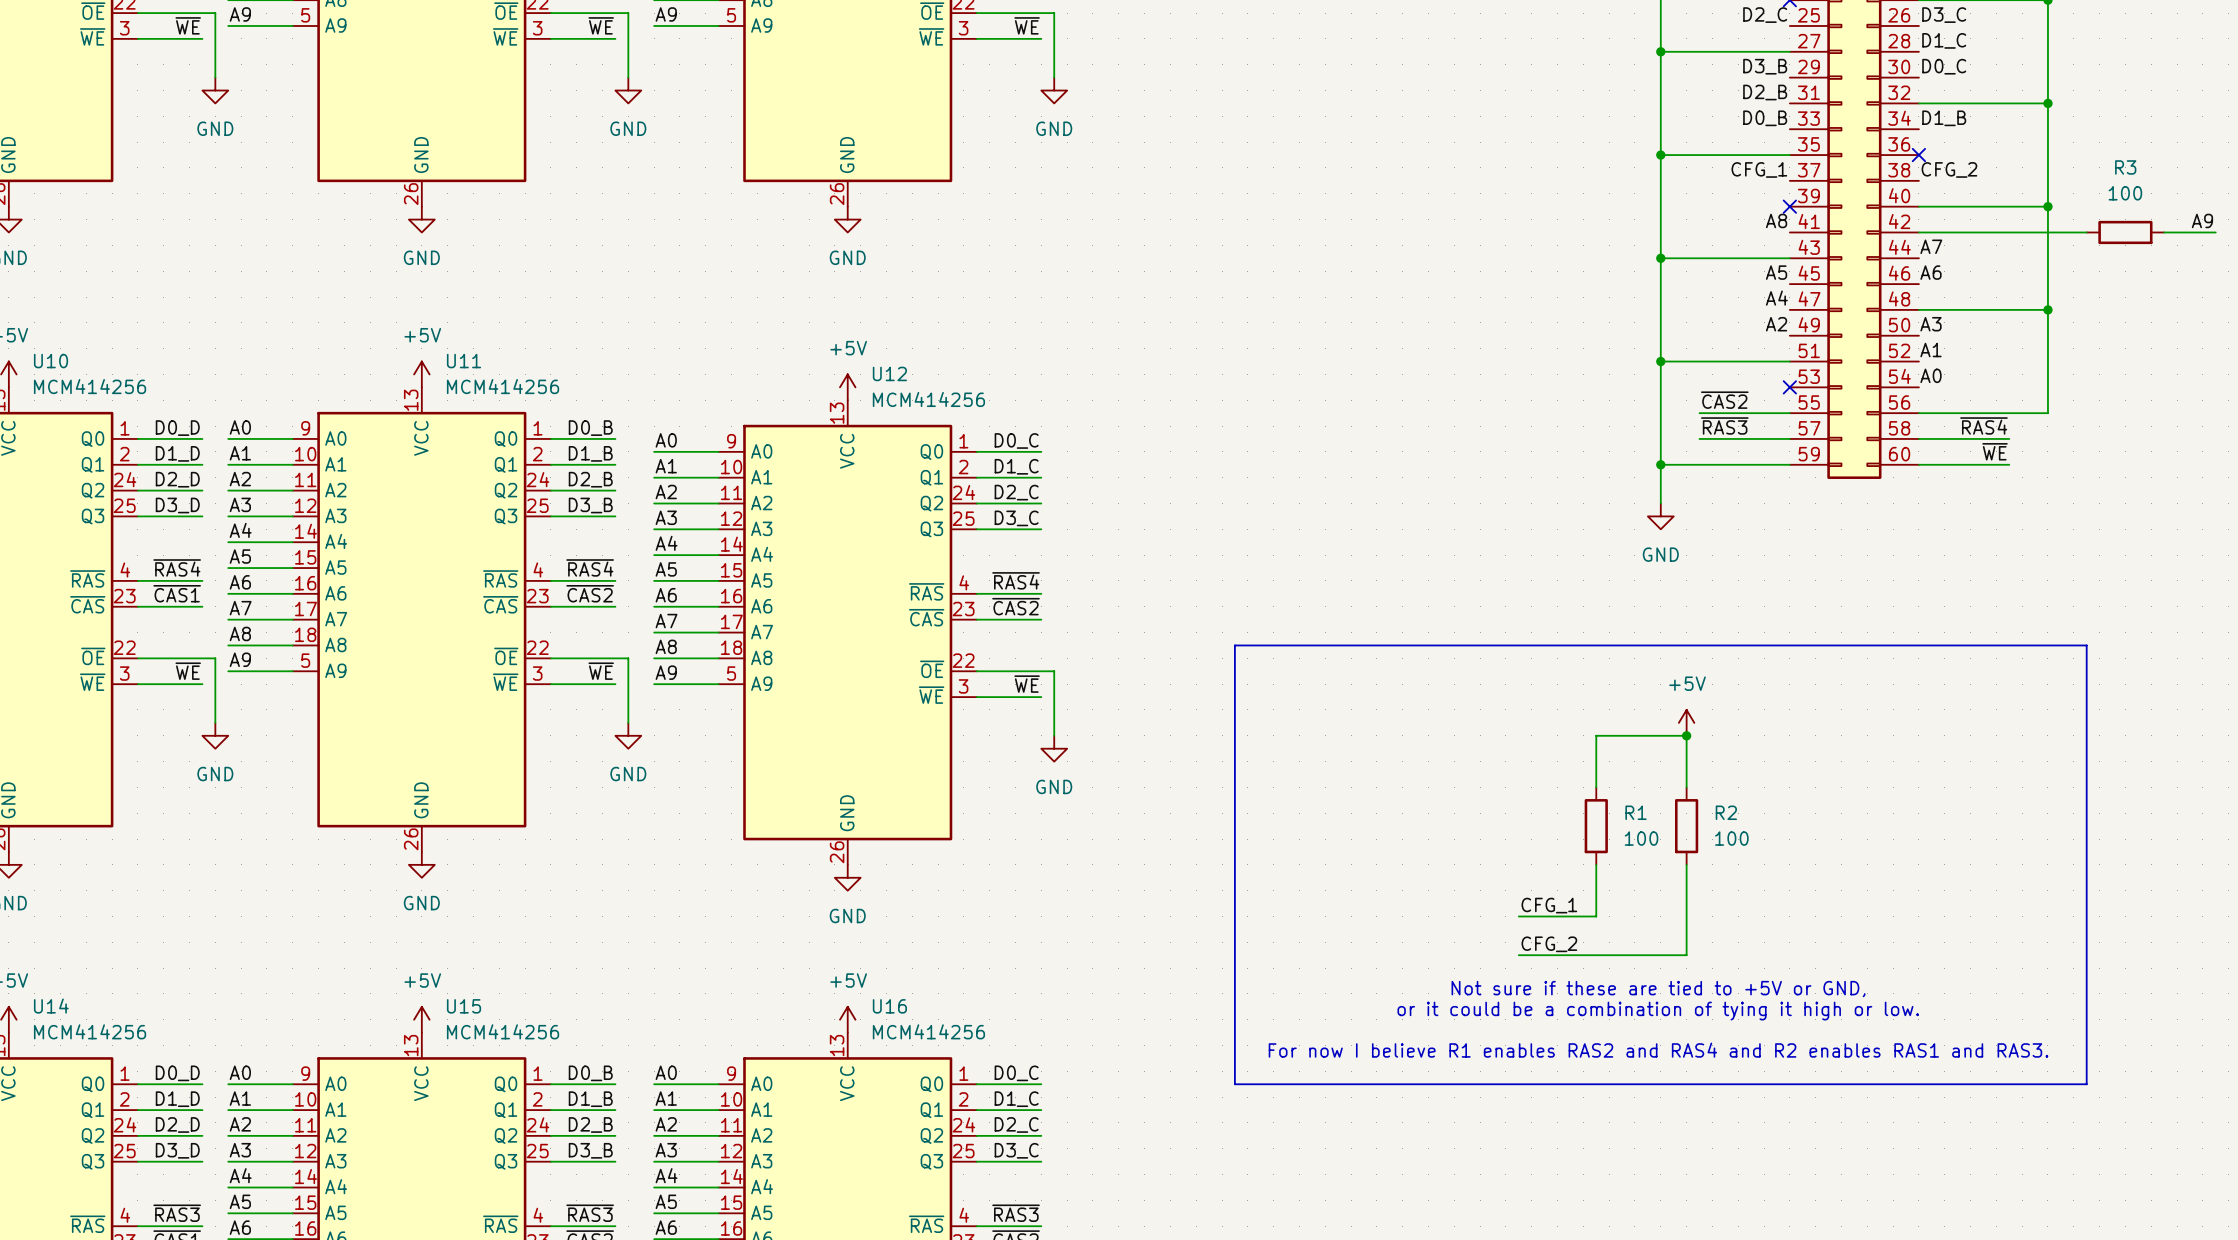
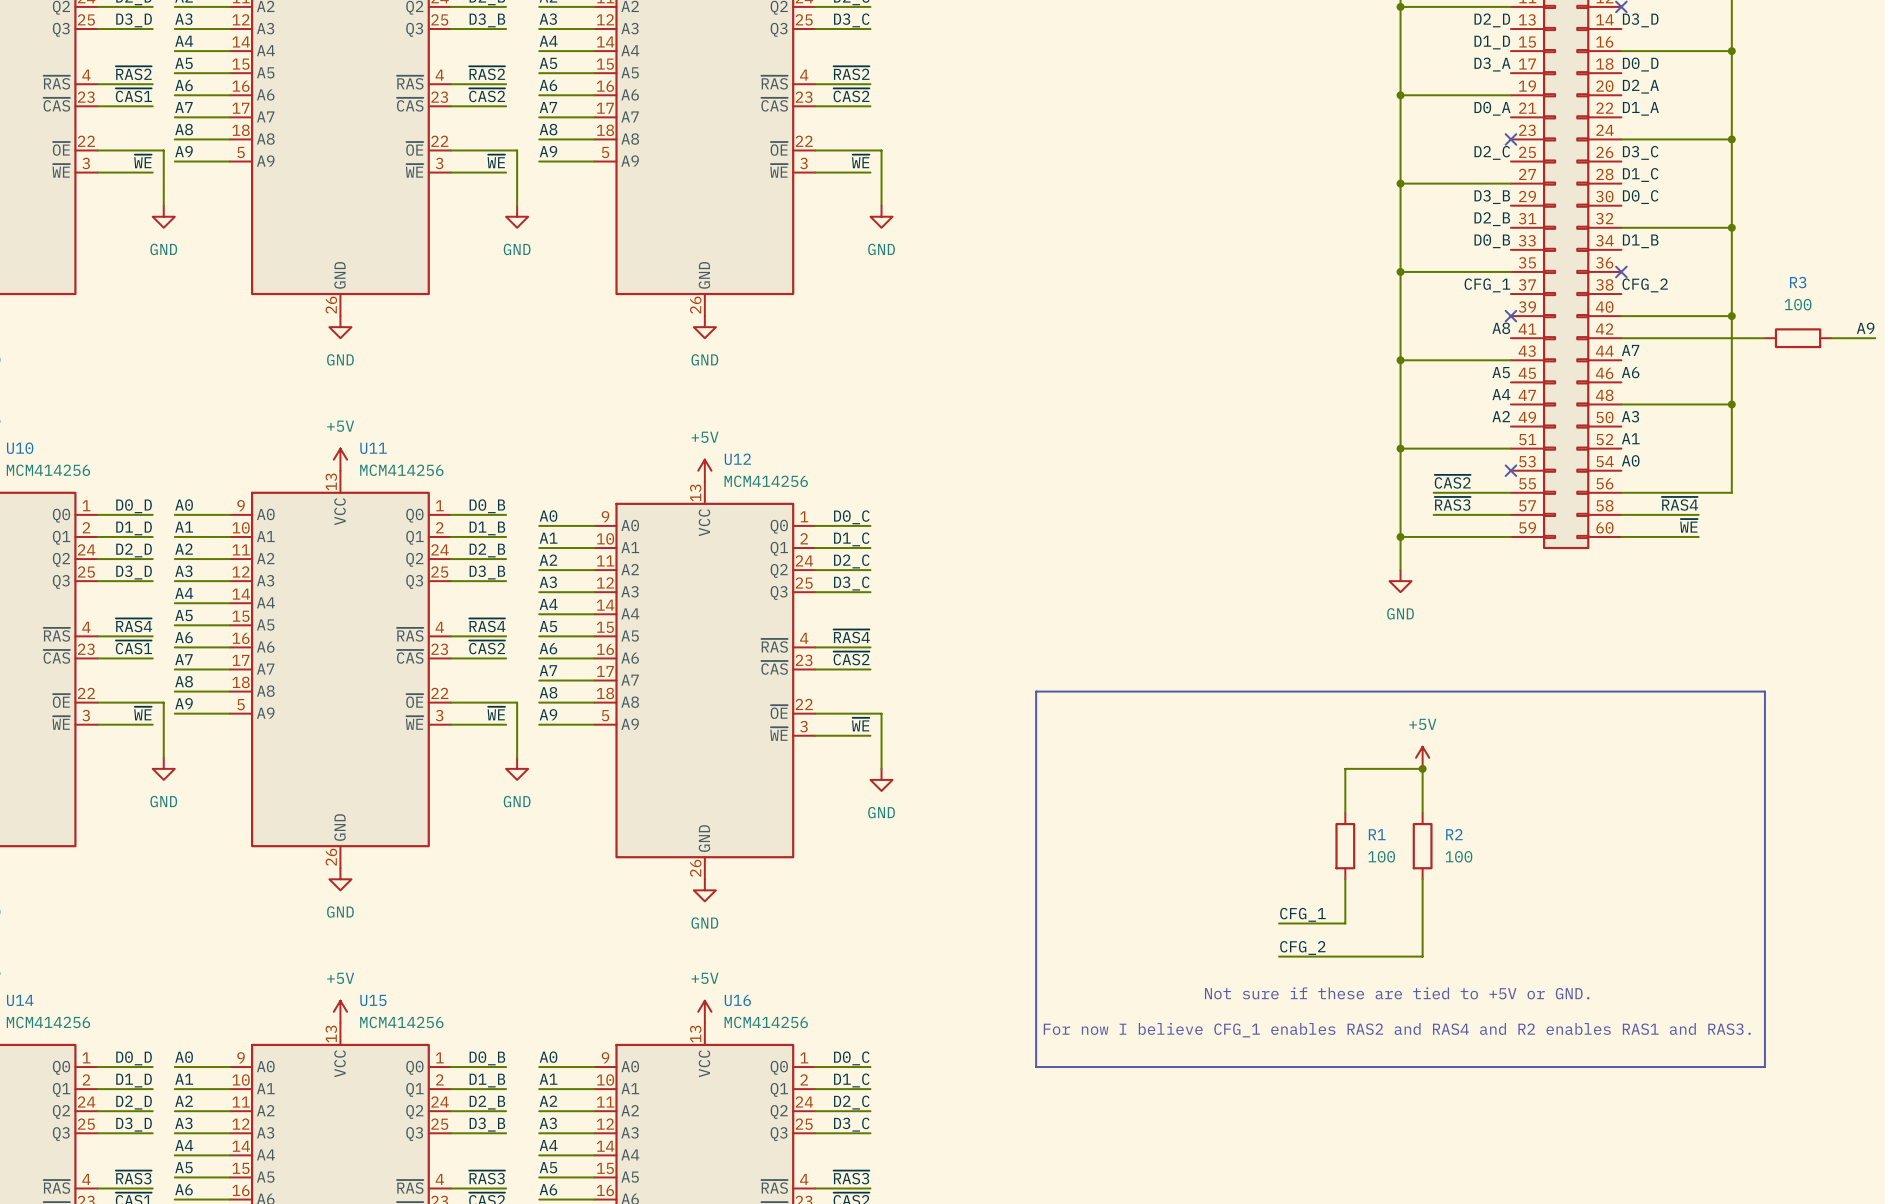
text: Not sure if these are tied to +5V or GND, (1658, 989) -> Not sure if these are tied to +5V or GND. (1397, 993)
text: or it could be a combination of tying it high or low. (1658, 1011) -> none
text: For now I believe R1 enables RAS2 and RAS4 and R2 enables RAS1 and RAS3. (1658, 1050) -> For now I believe CFG_1 enables RAS2 and RAS4 and R2 enables RAS1 and RAS3. (1397, 1030)

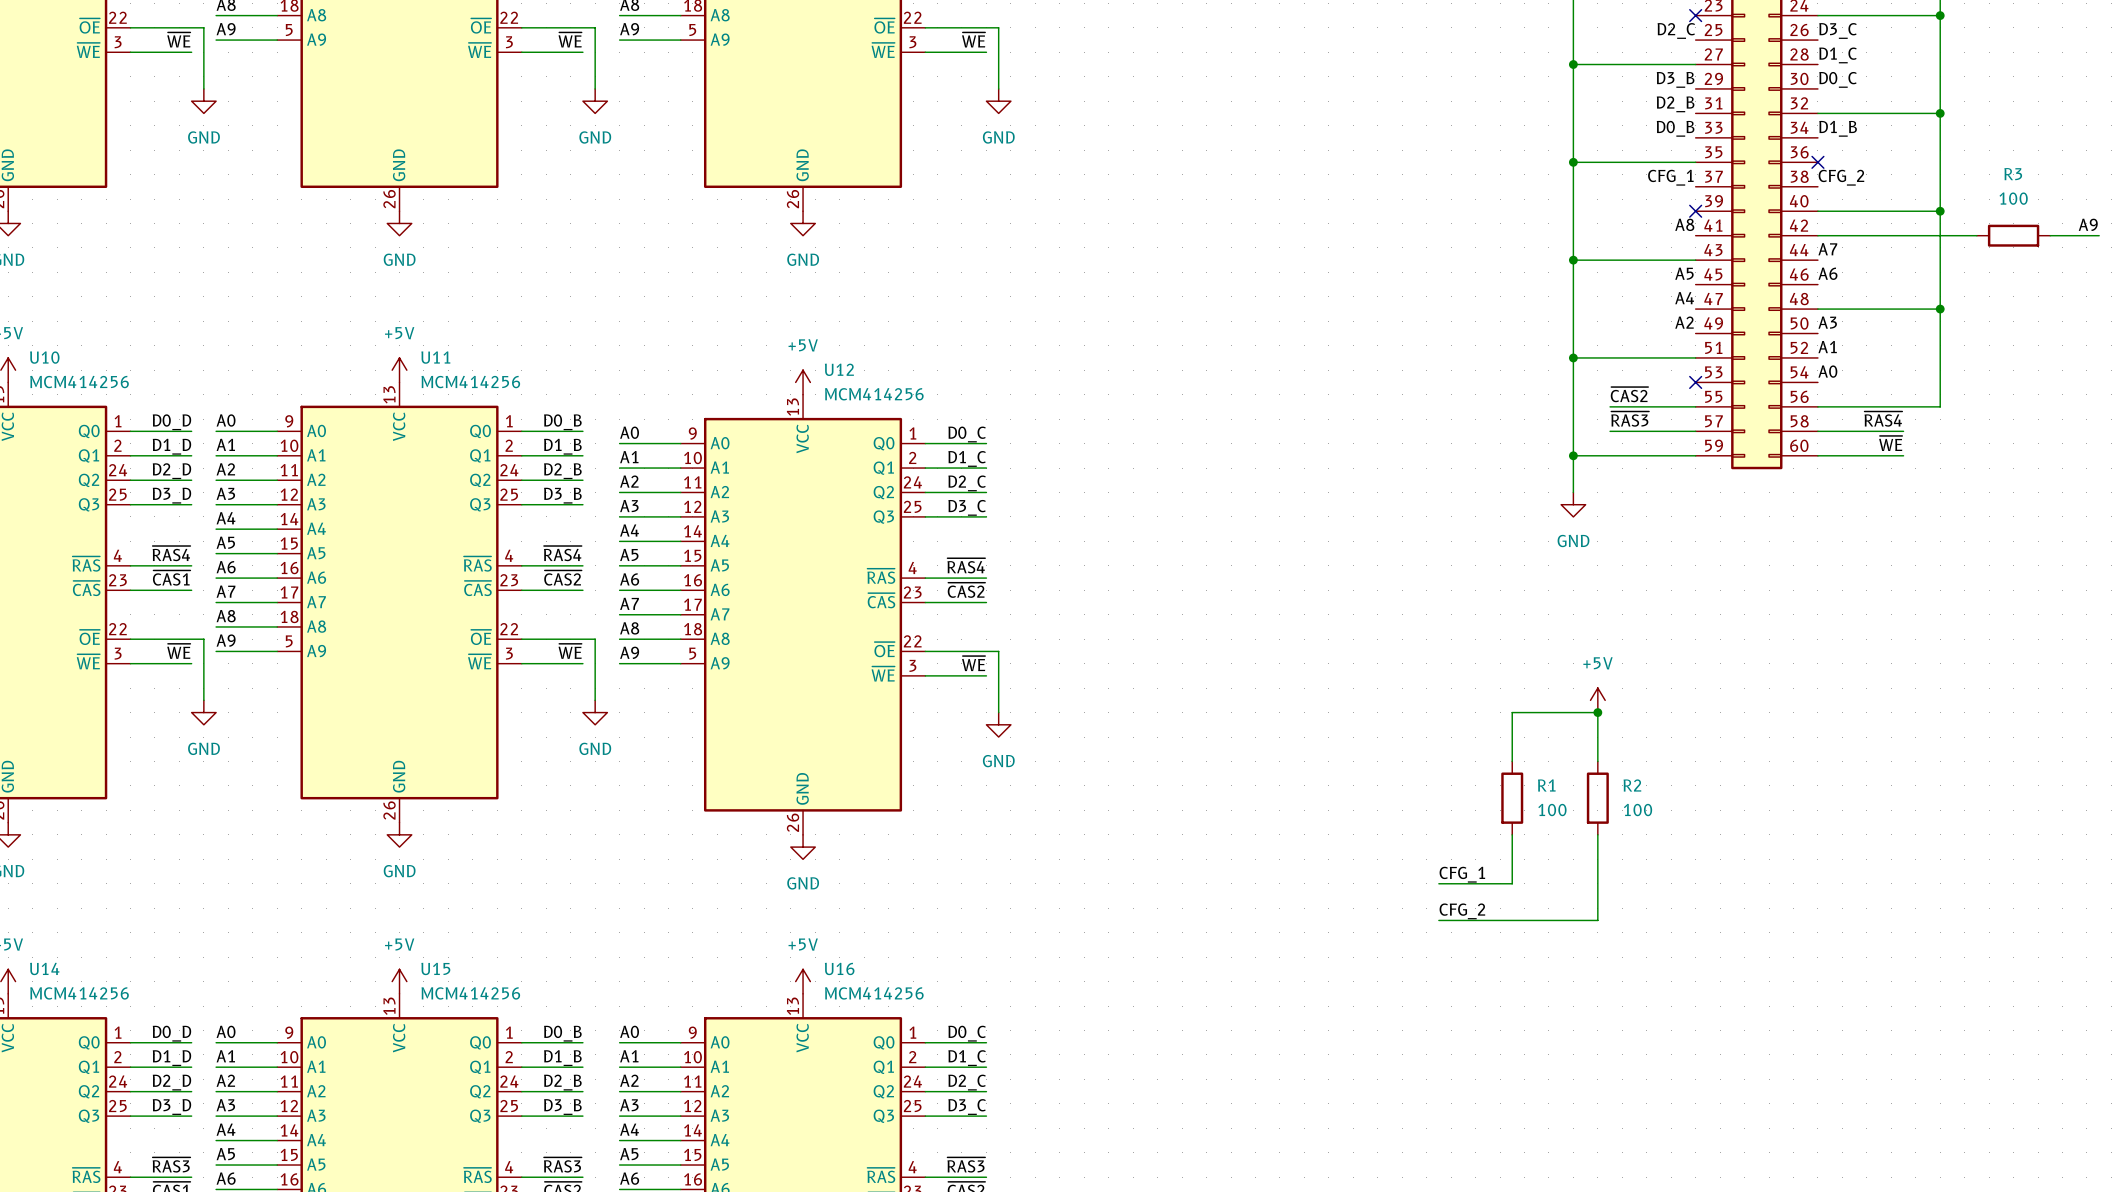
line: (1036, 691) (1764, 691) (1764, 1067) (1036, 1067) (1036, 691) -> none
text: Not sure if these are tied to +5V or GND. (1397, 993) -> none
text: For now I believe CFG_1 enables RAS2 and RAS4 and R2 enables RAS1 and RAS3. (1397, 1030) -> none

